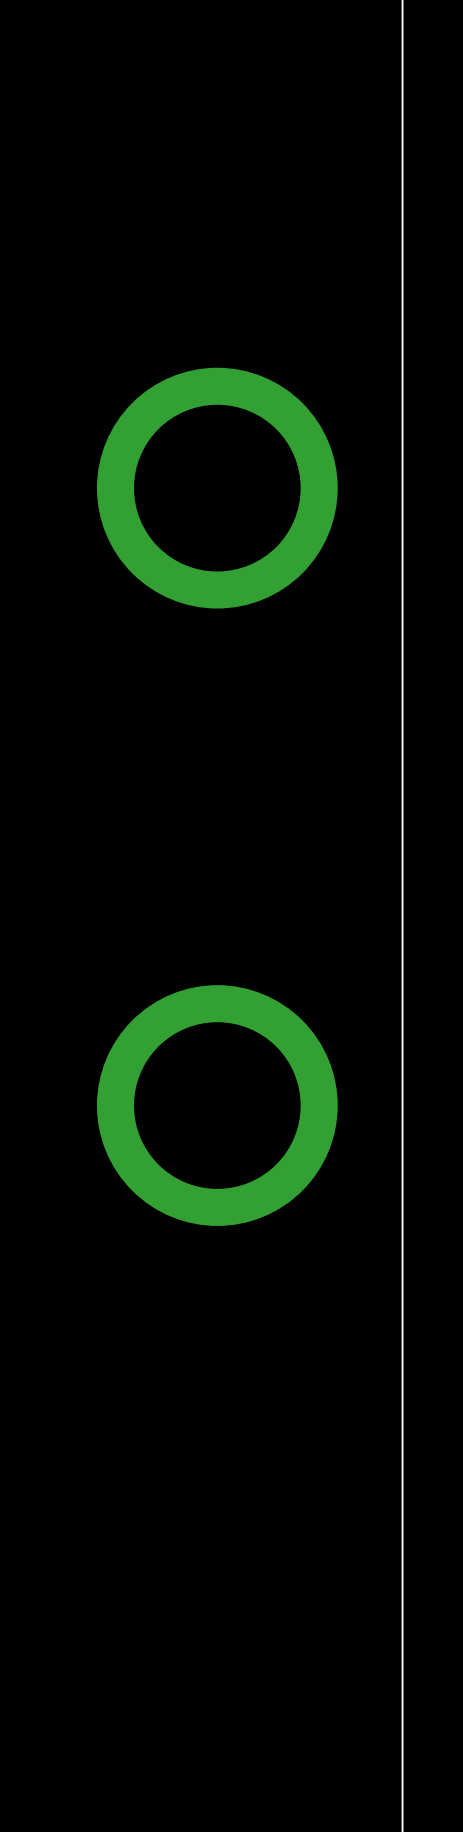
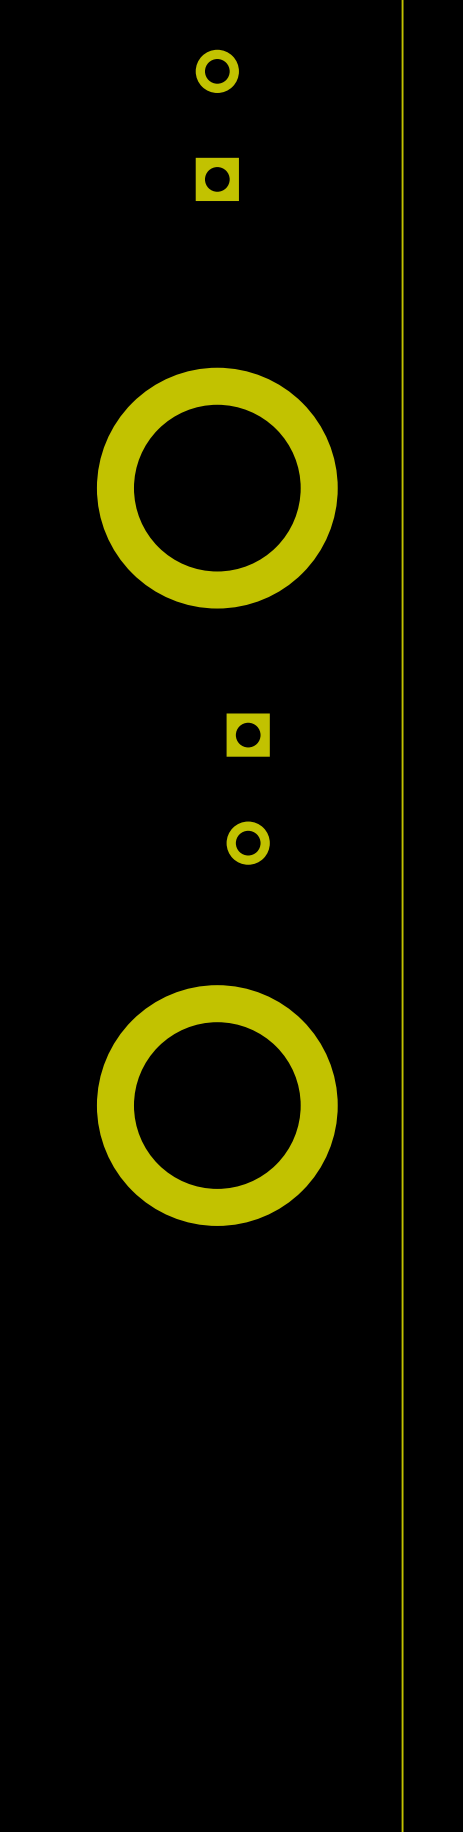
part: none -> (217, 125)
part: none -> (248, 789)

